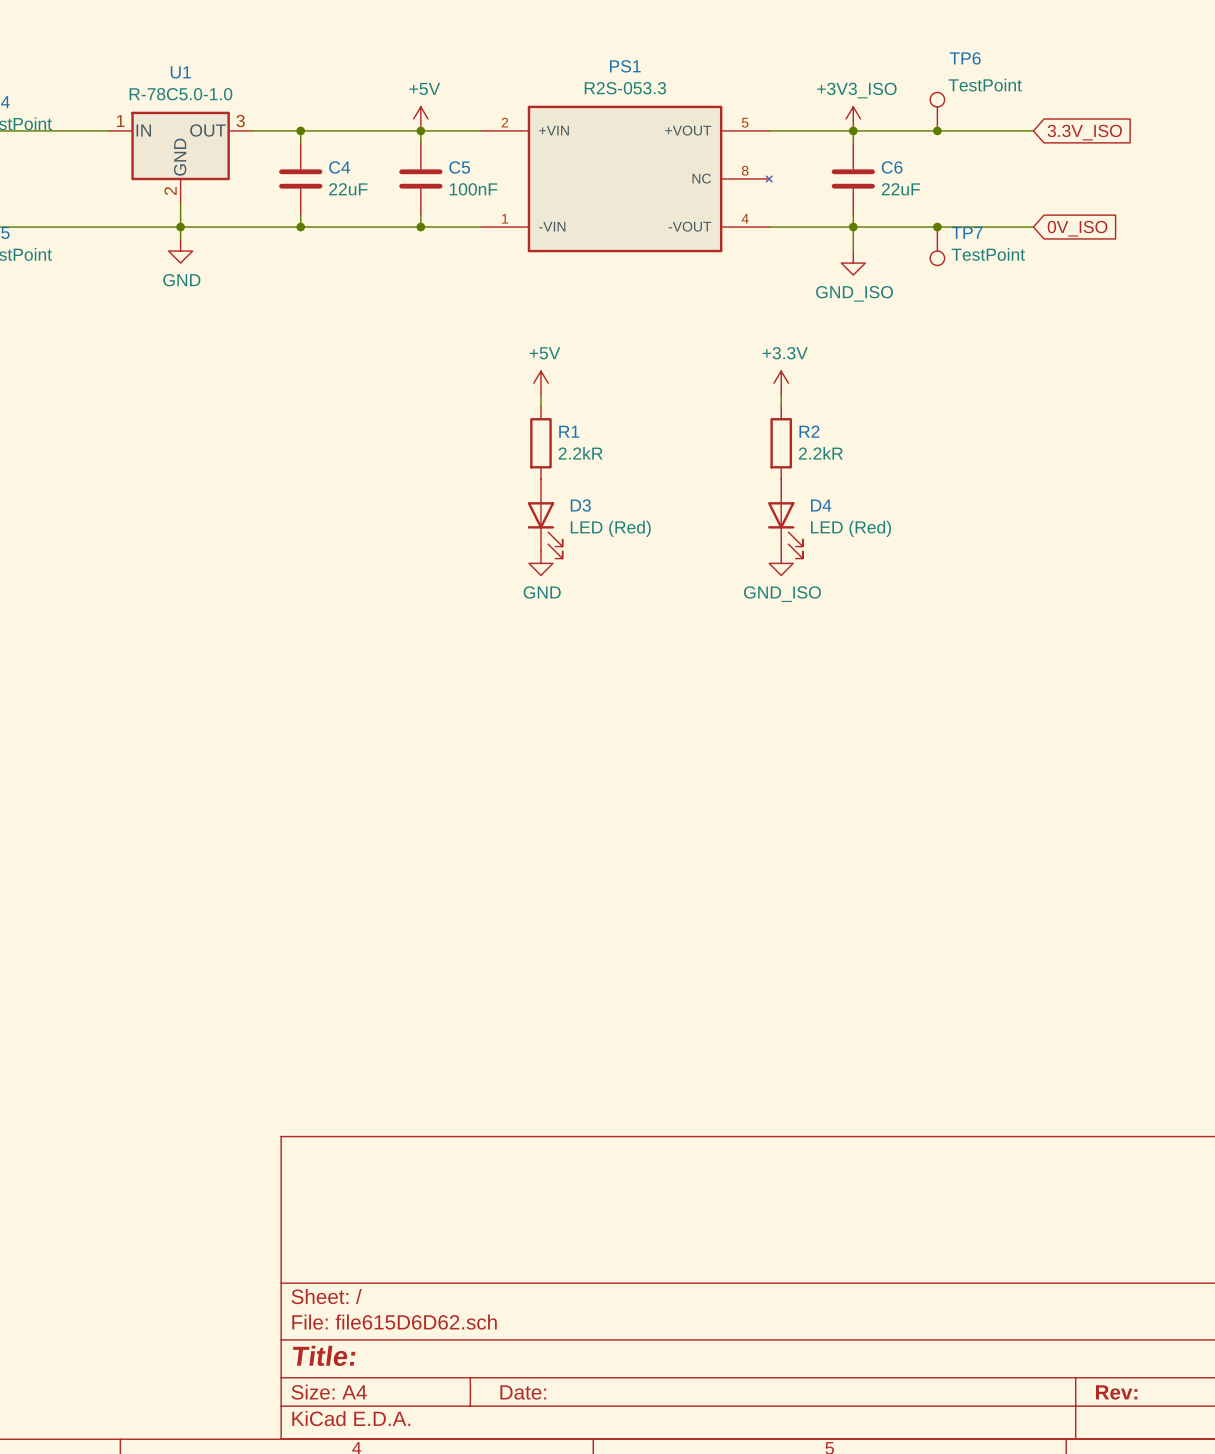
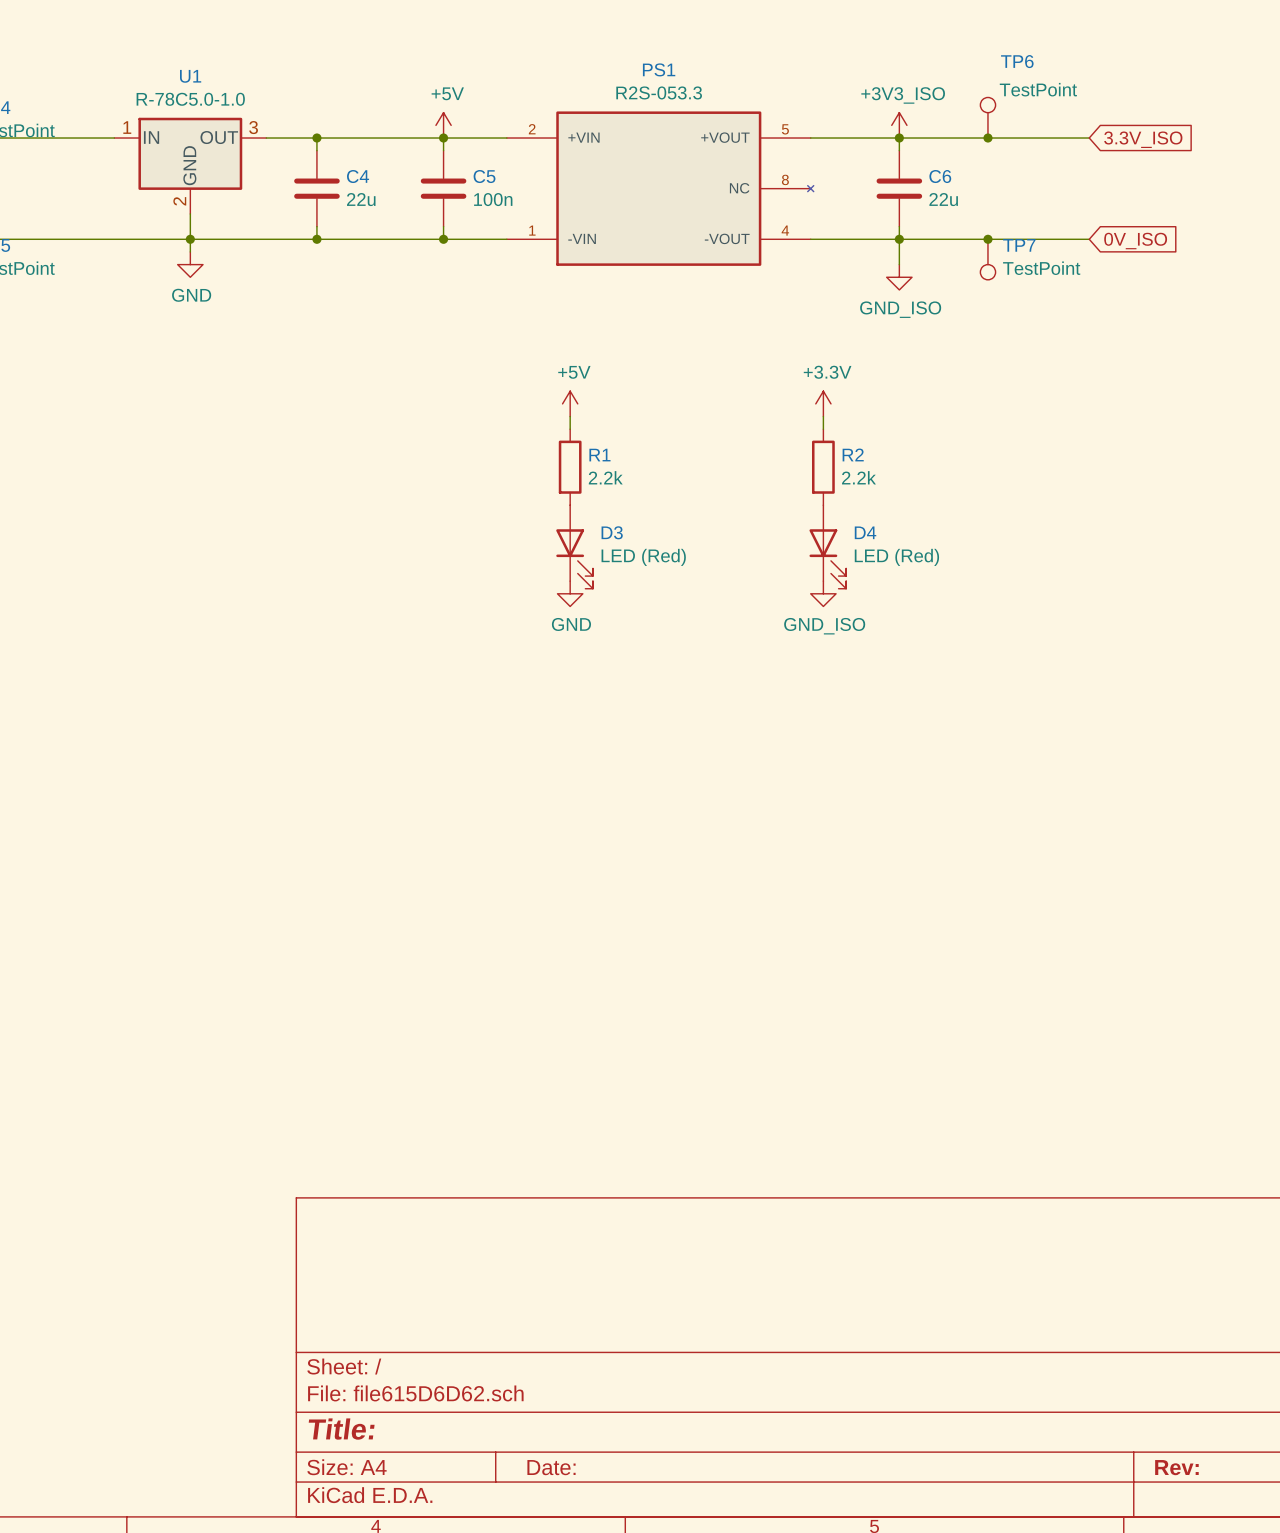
C4 value: 22uF (348, 189) -> 22u (361, 199)
C5 value: 100nF (473, 189) -> 100n (493, 199)
C6 value: 22uF (900, 189) -> 22u (943, 199)
R1 value: 2.2kR (580, 453) -> 2.2k (605, 477)
R2 value: 2.2kR (820, 453) -> 2.2k (858, 477)

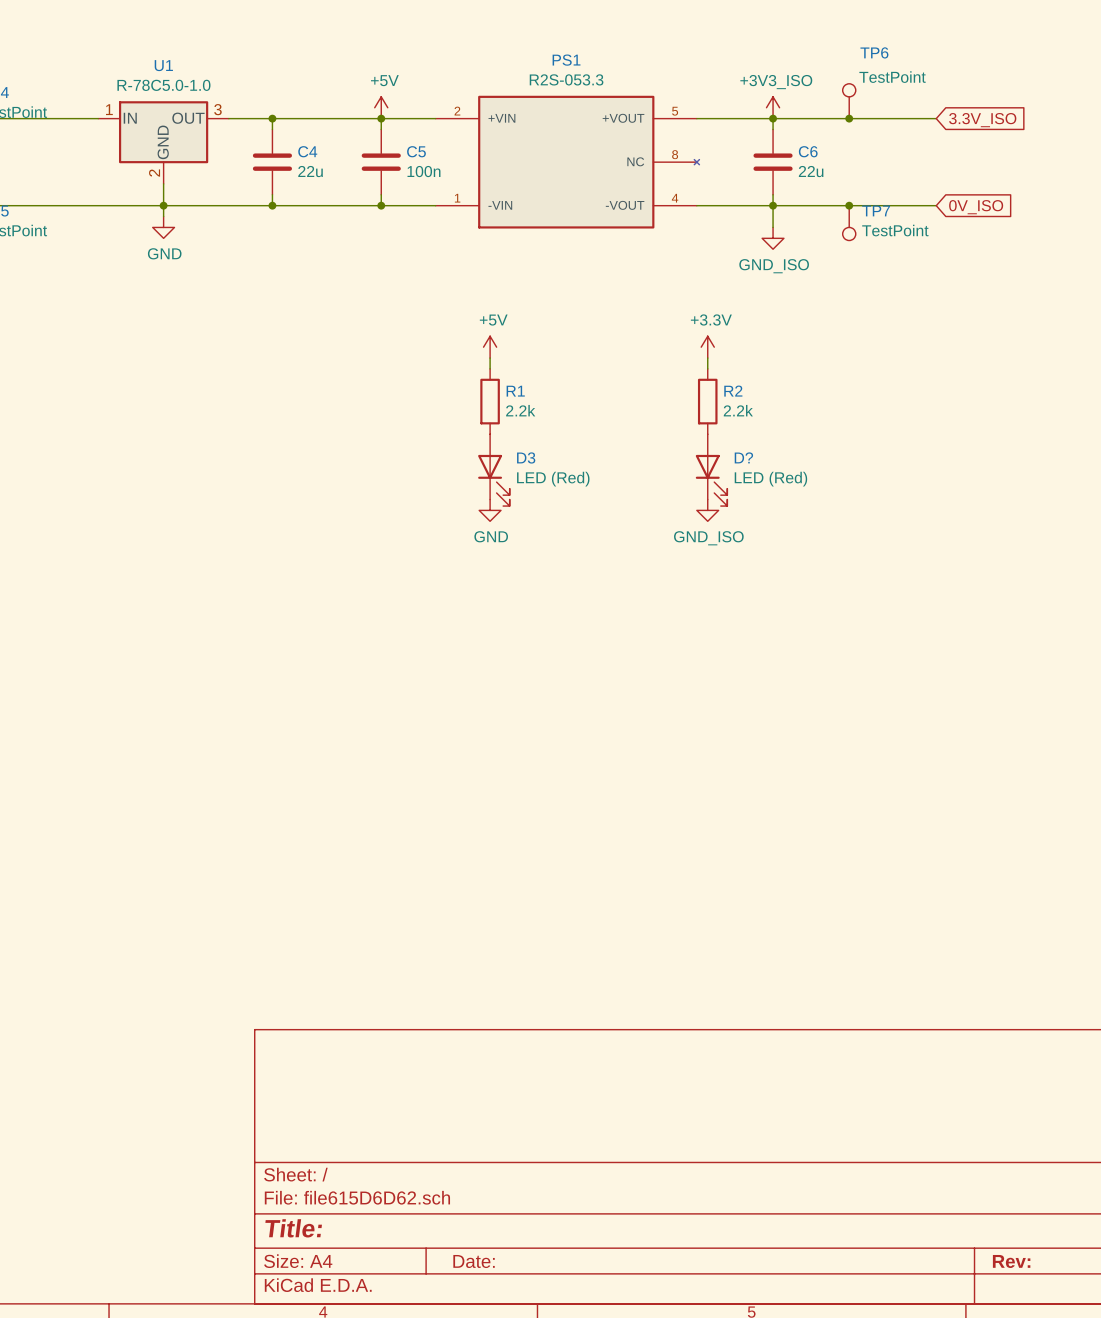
D4 name: D4 (865, 532) -> D? (743, 457)

